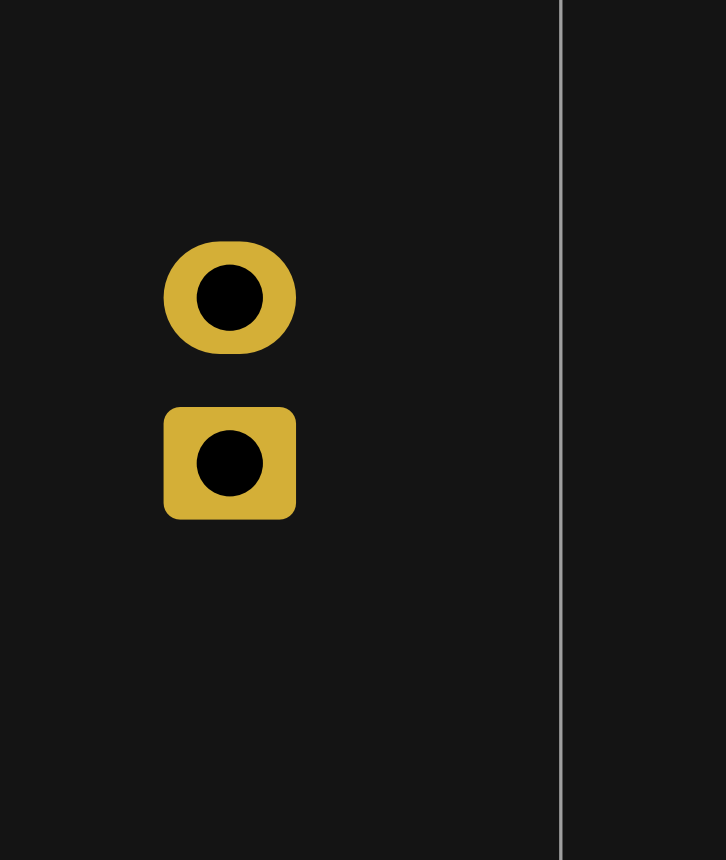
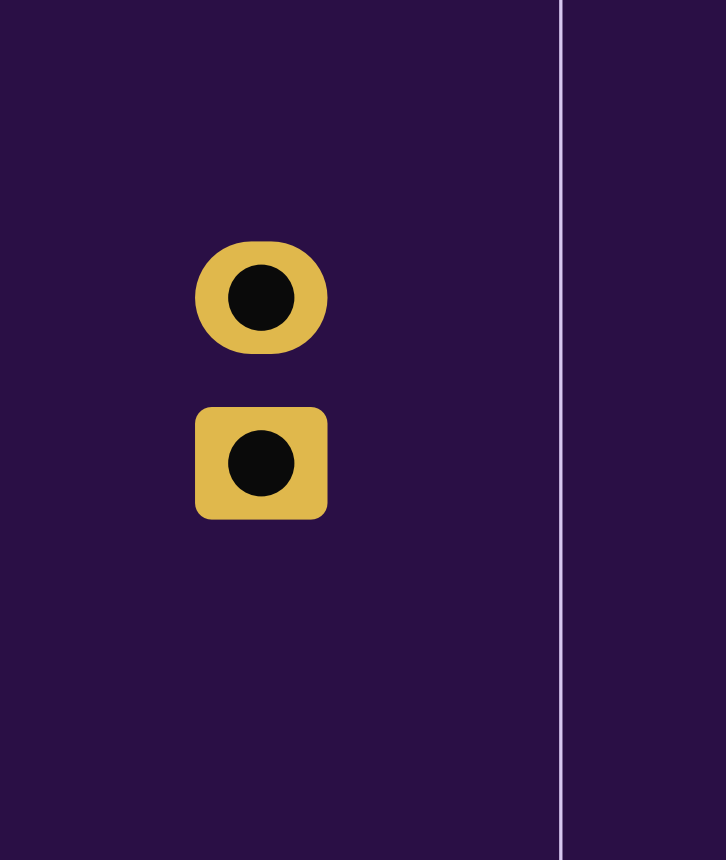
part footprint: [163, 241, 297, 520] -> [195, 241, 328, 520]

